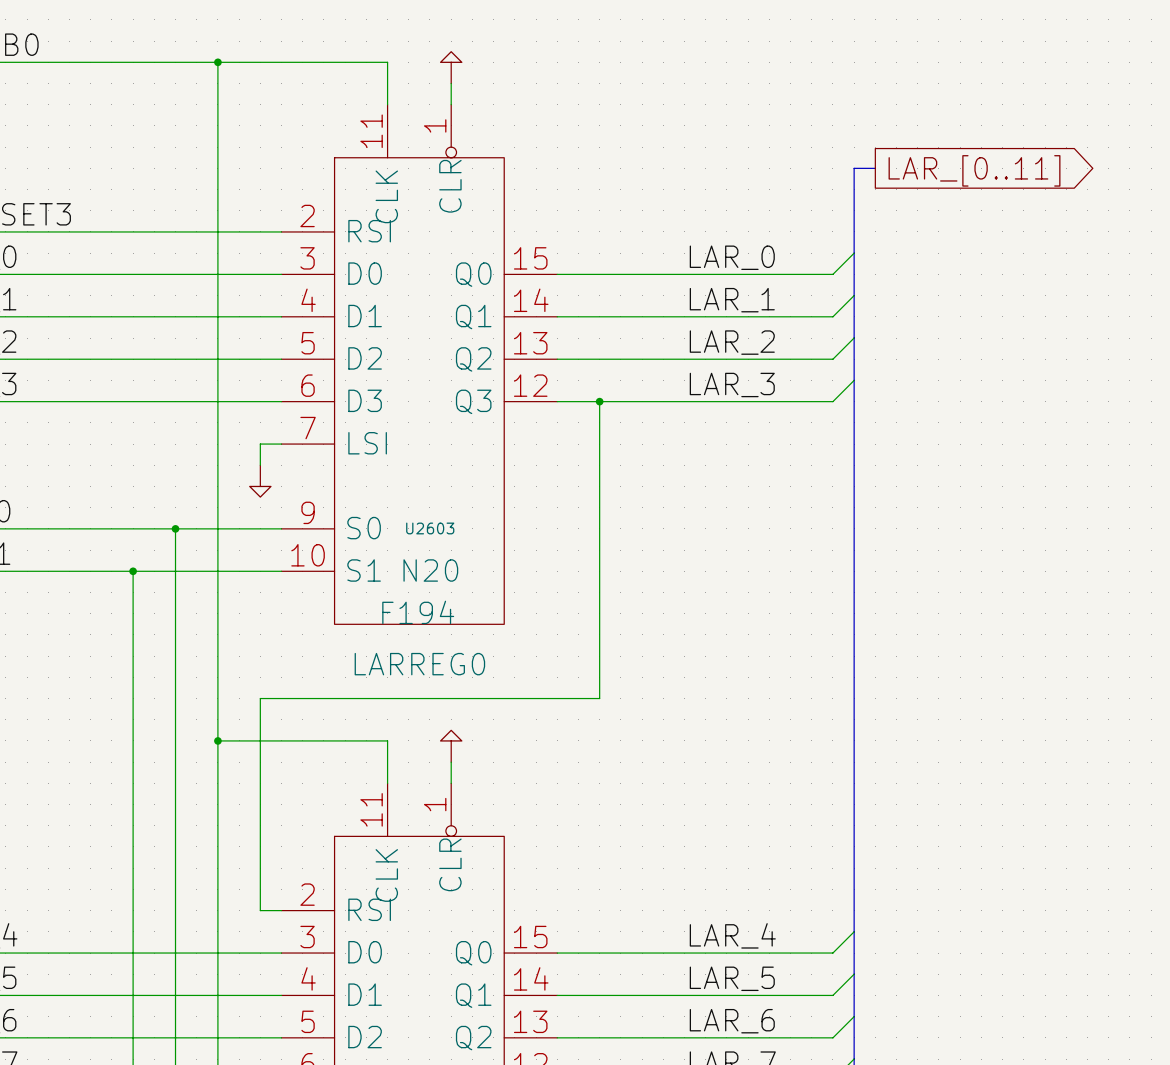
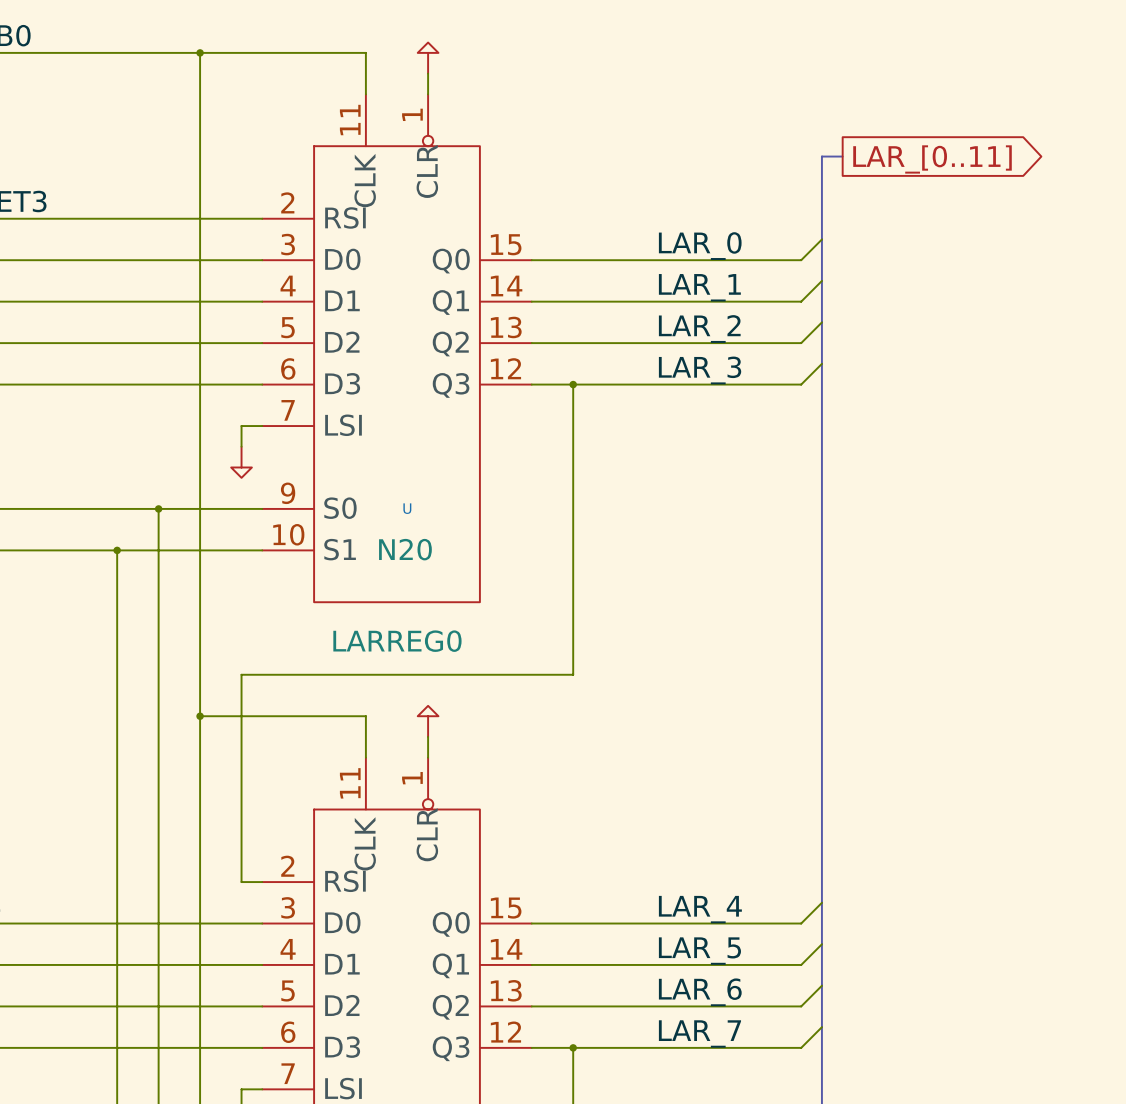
U2603 name: U2603 (430, 528) -> U (407, 508)
U2603 value: F194 (418, 612) -> none

